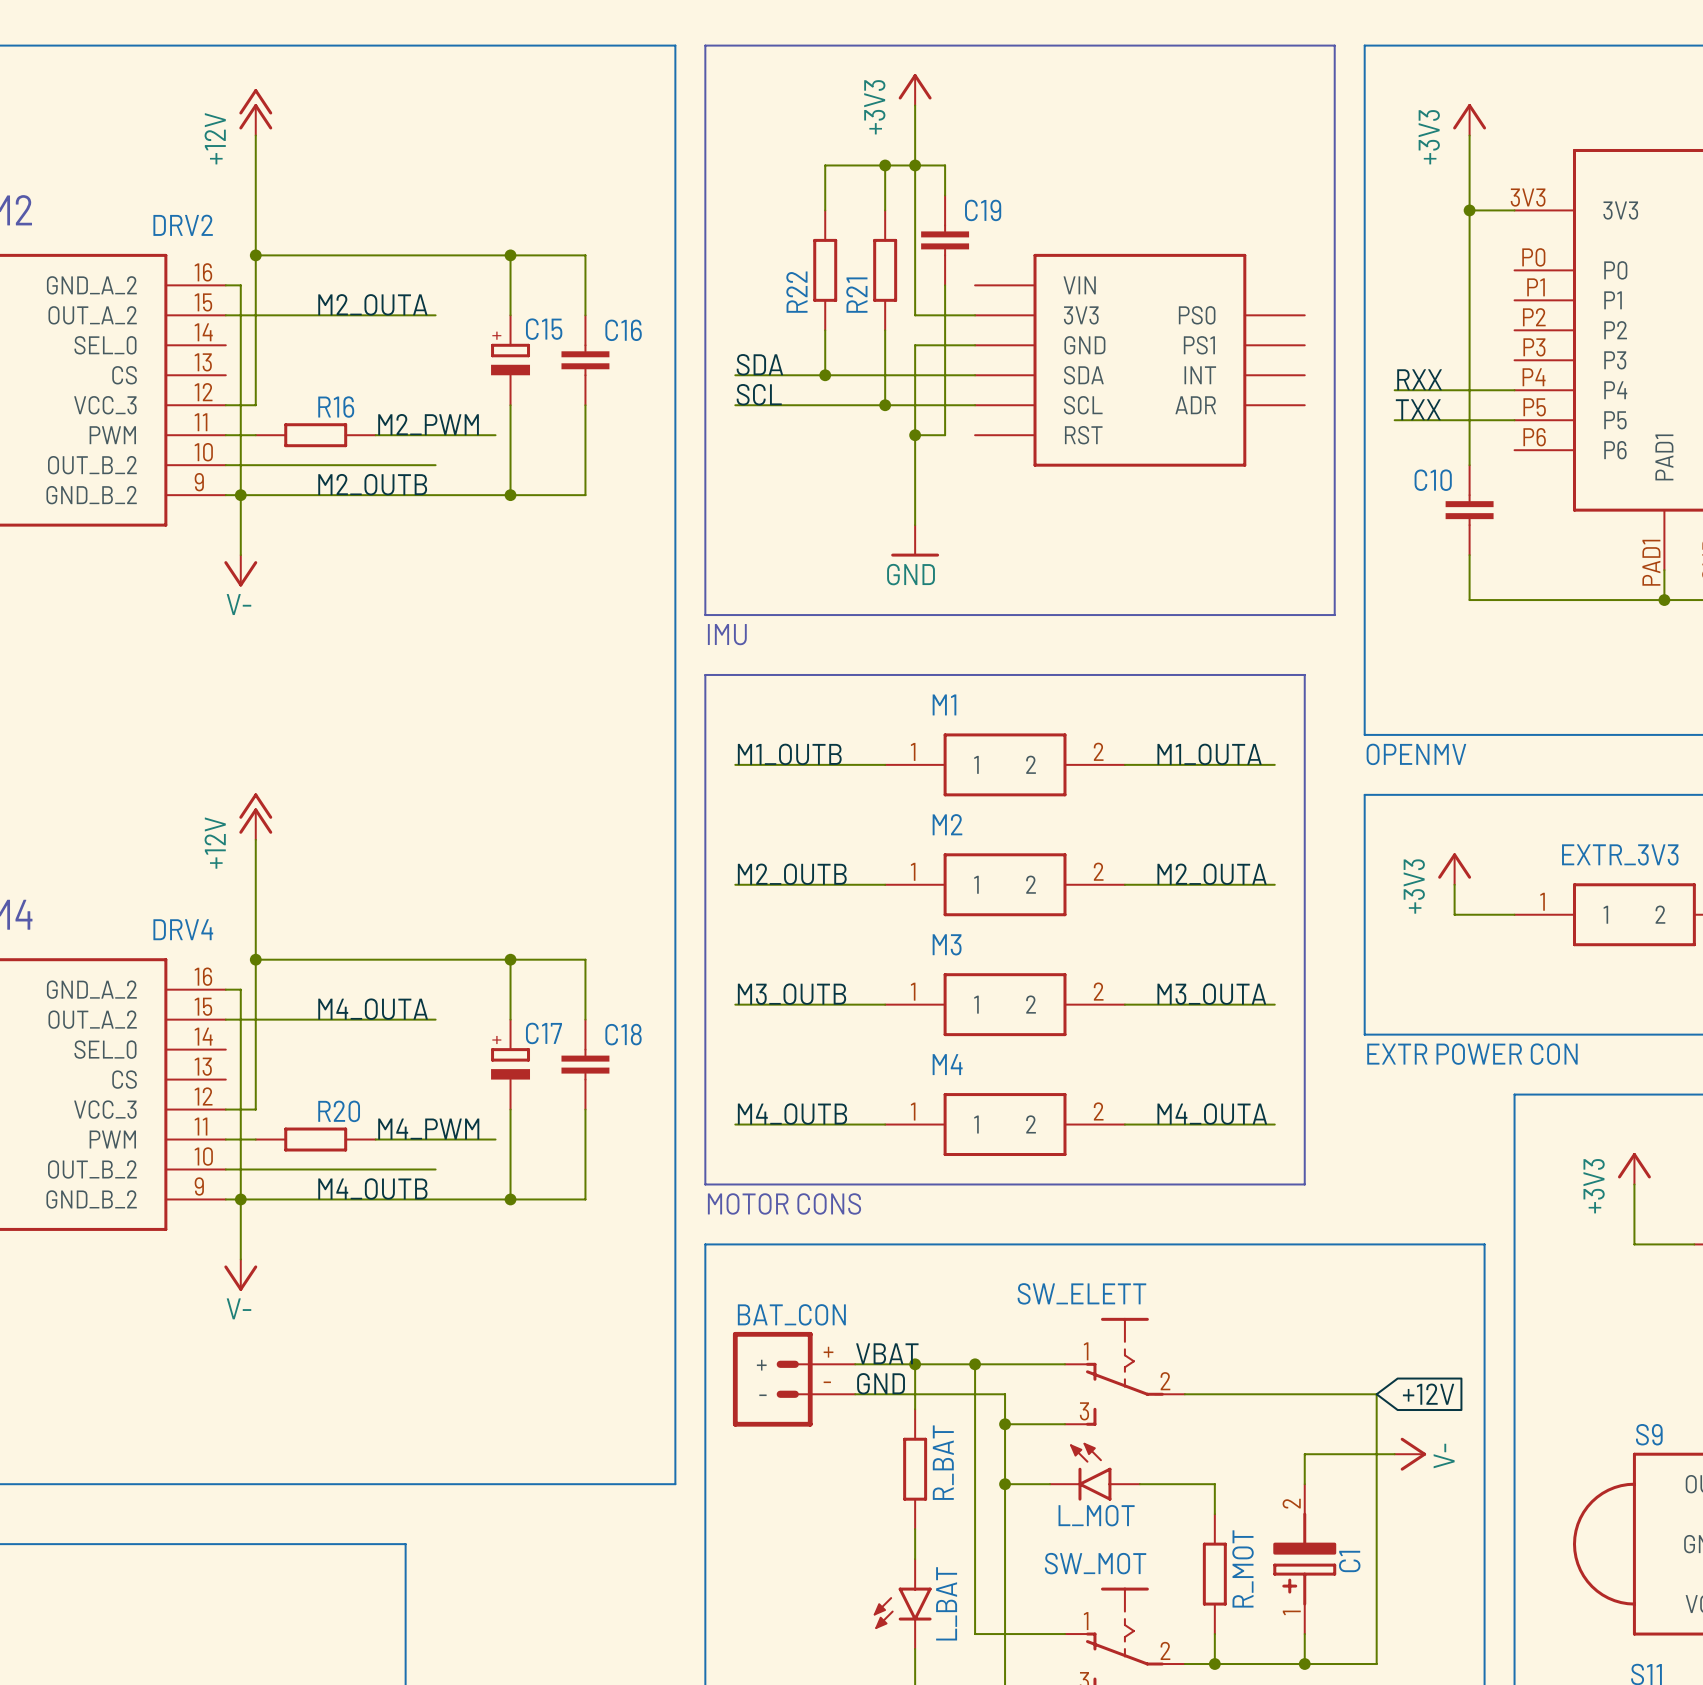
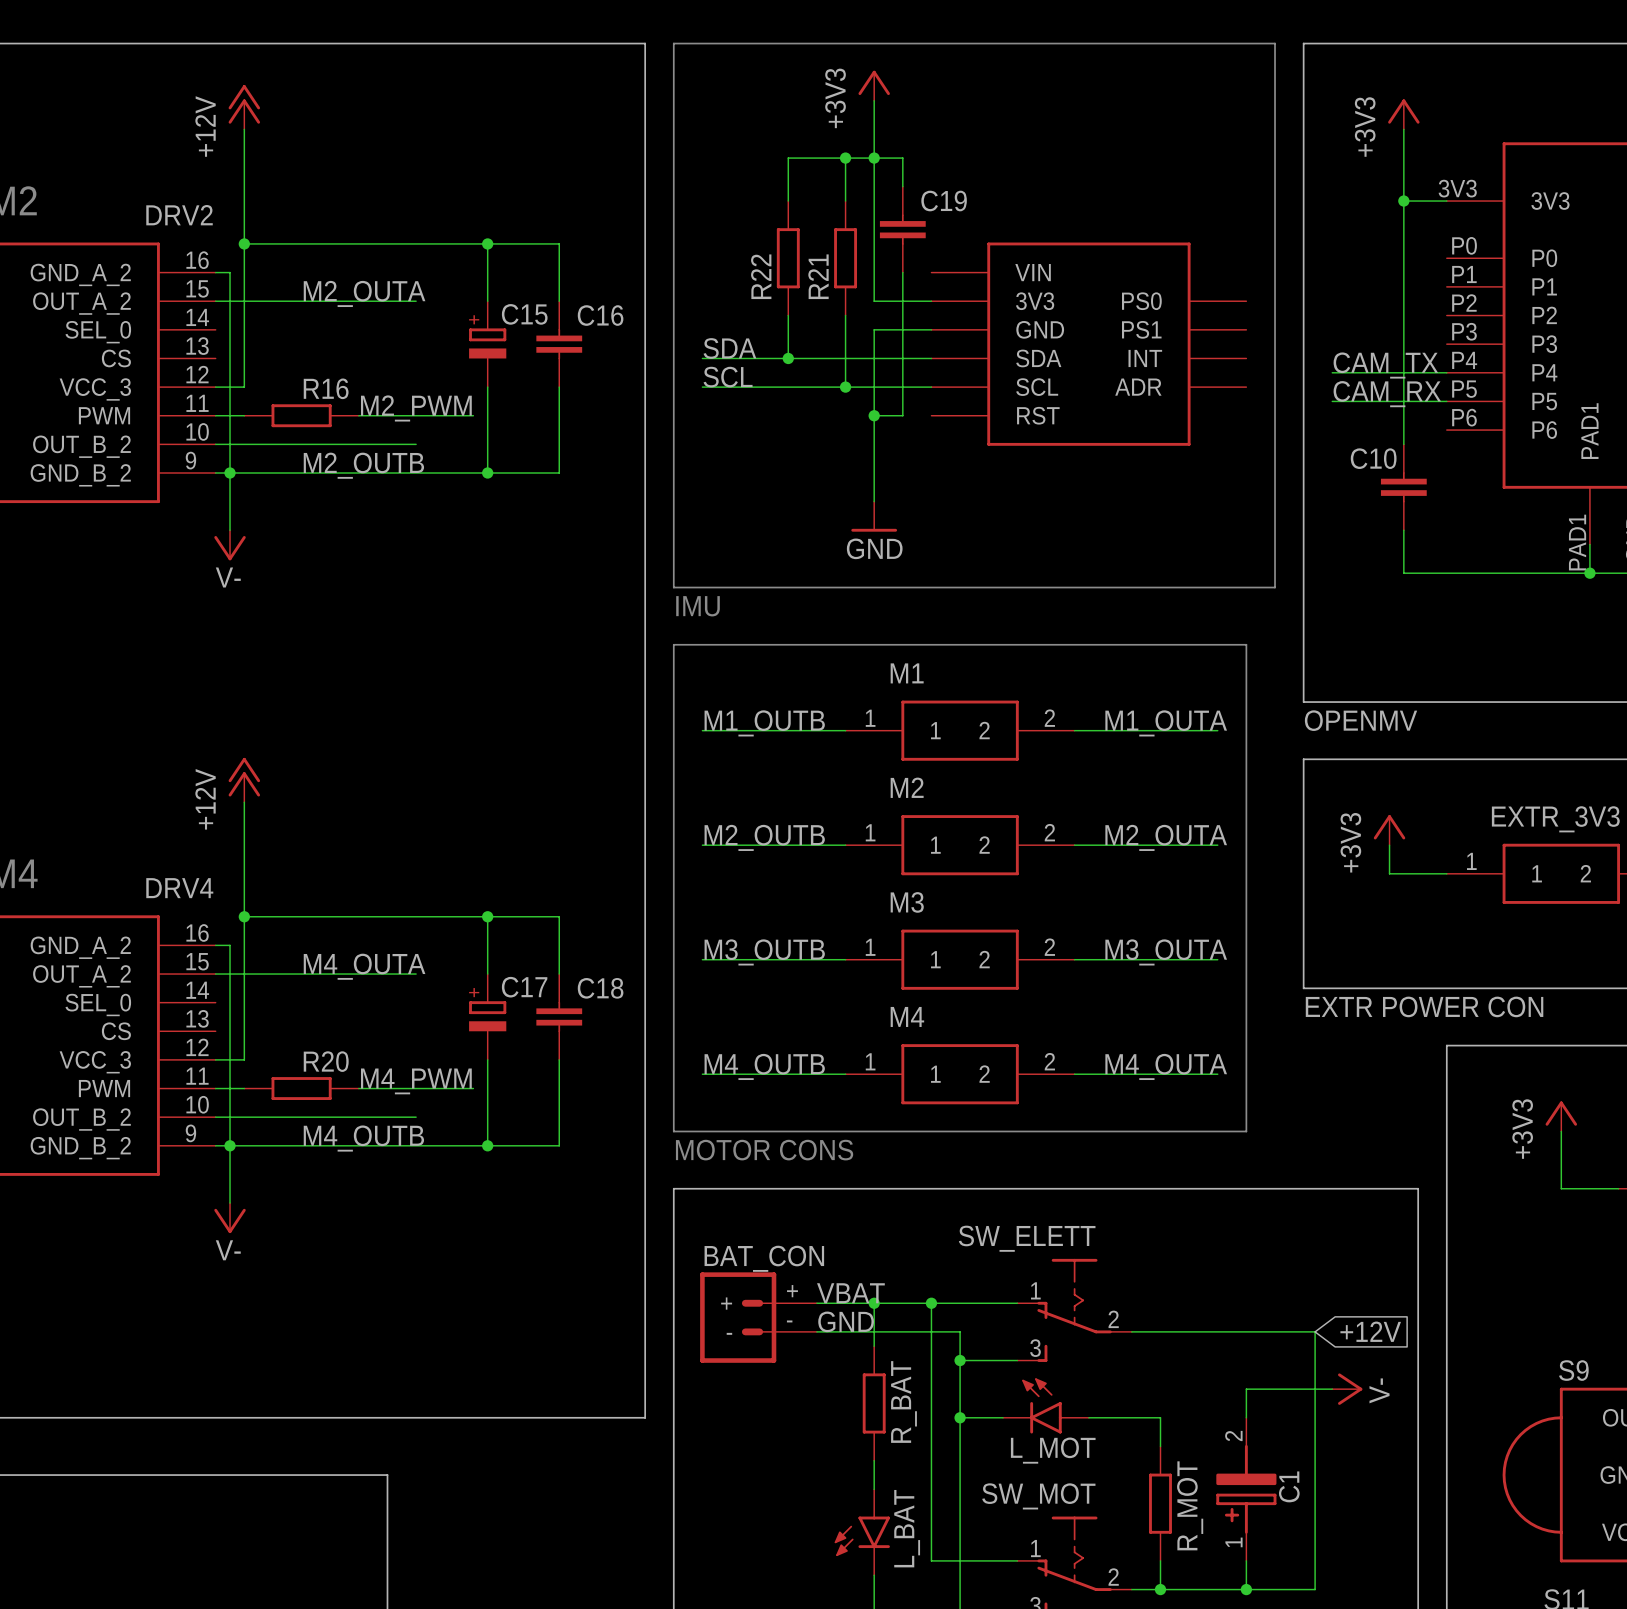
label: RXX (1419, 379) -> CAM_TX (1385, 365)
label: TXX (1418, 409) -> CAM_RX (1387, 394)

